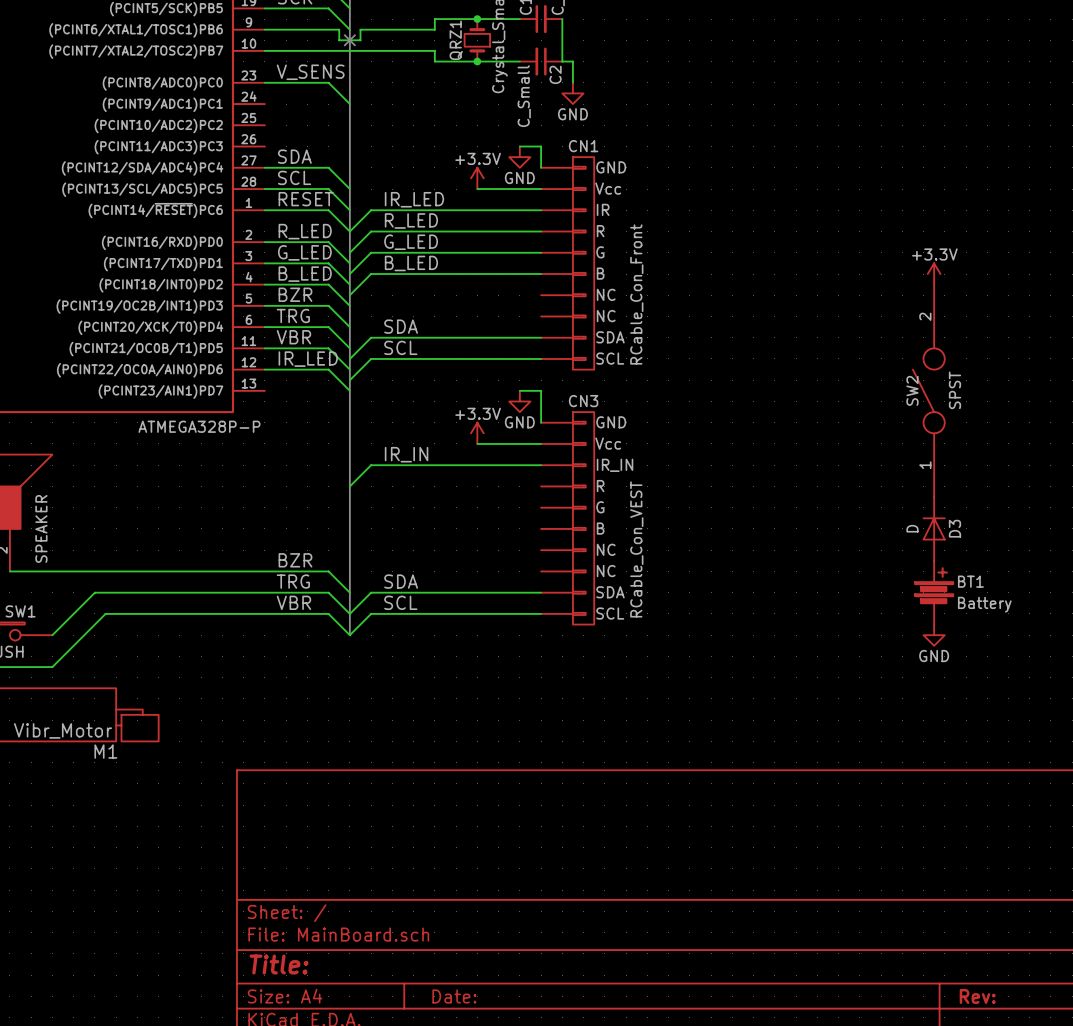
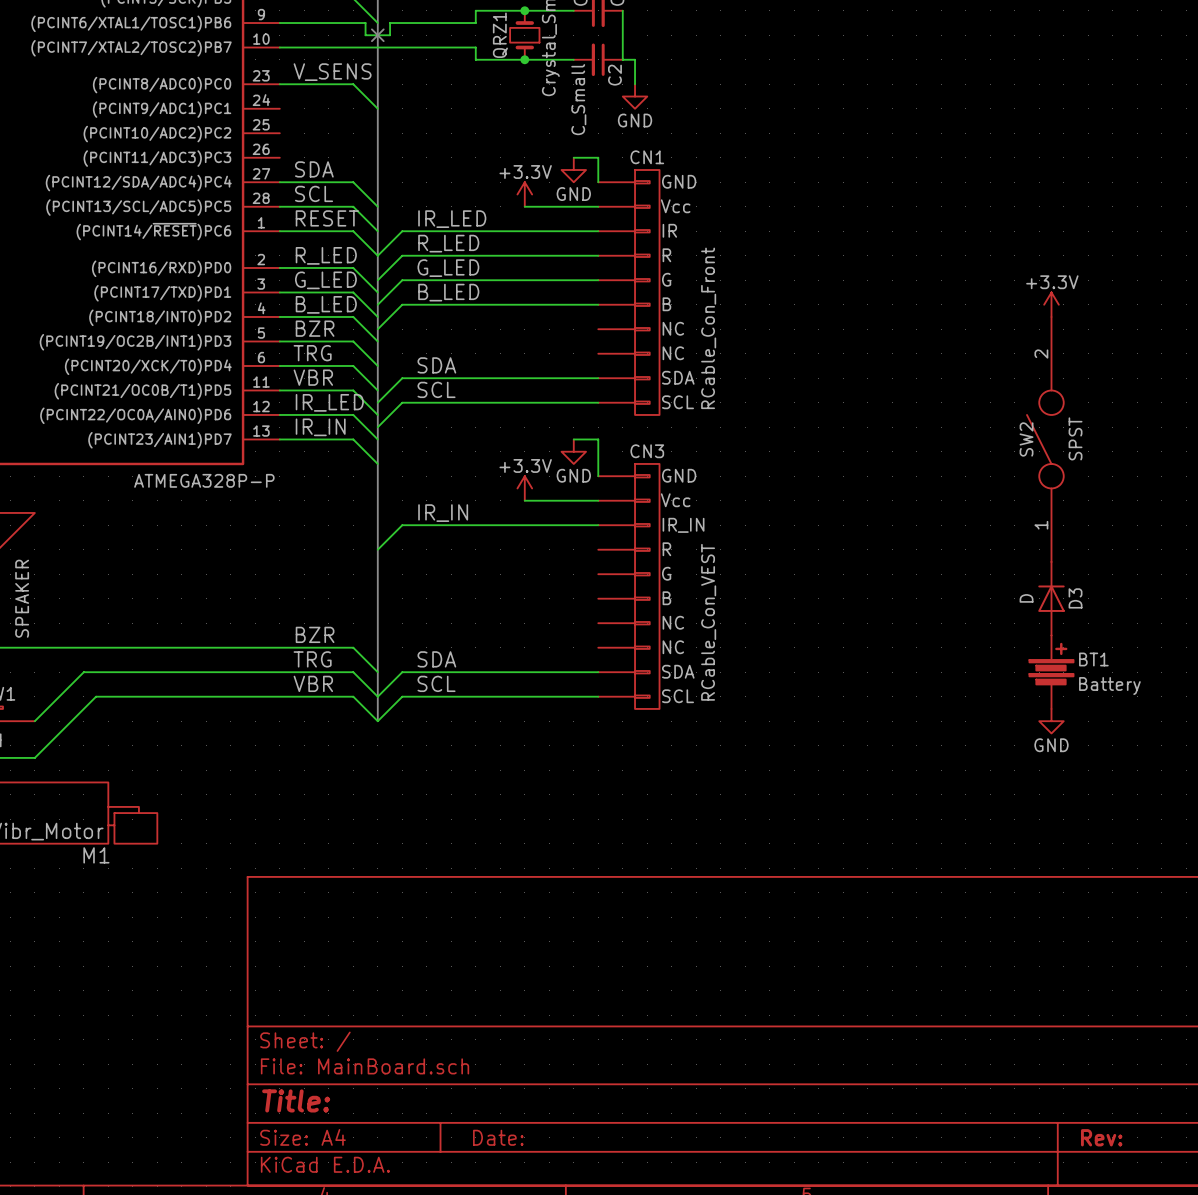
label: none -> IR_IN (320, 427)
wire: none -> (279, 439) (353, 439) (377, 463)

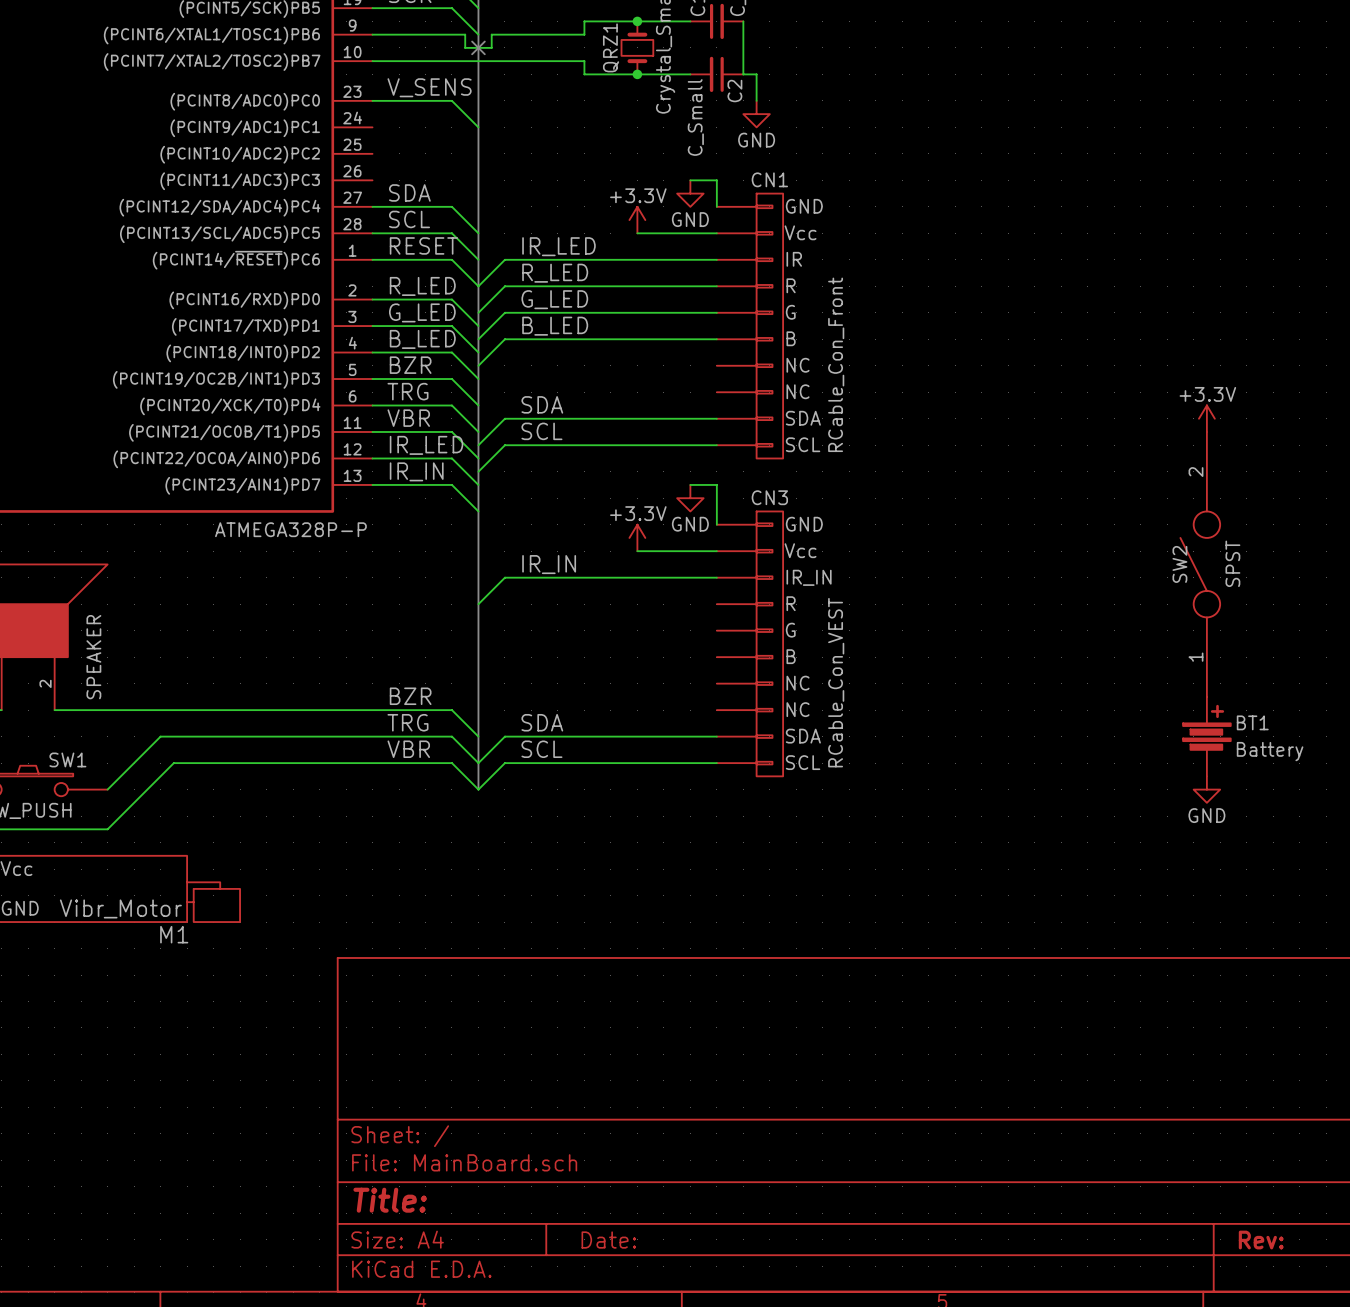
power symbol position: +3.3V (1051, 304) -> +3.3V (1206, 418)
SW2 position: (1045, 439) -> (1200, 564)
D3: D (1051, 598) -> none

